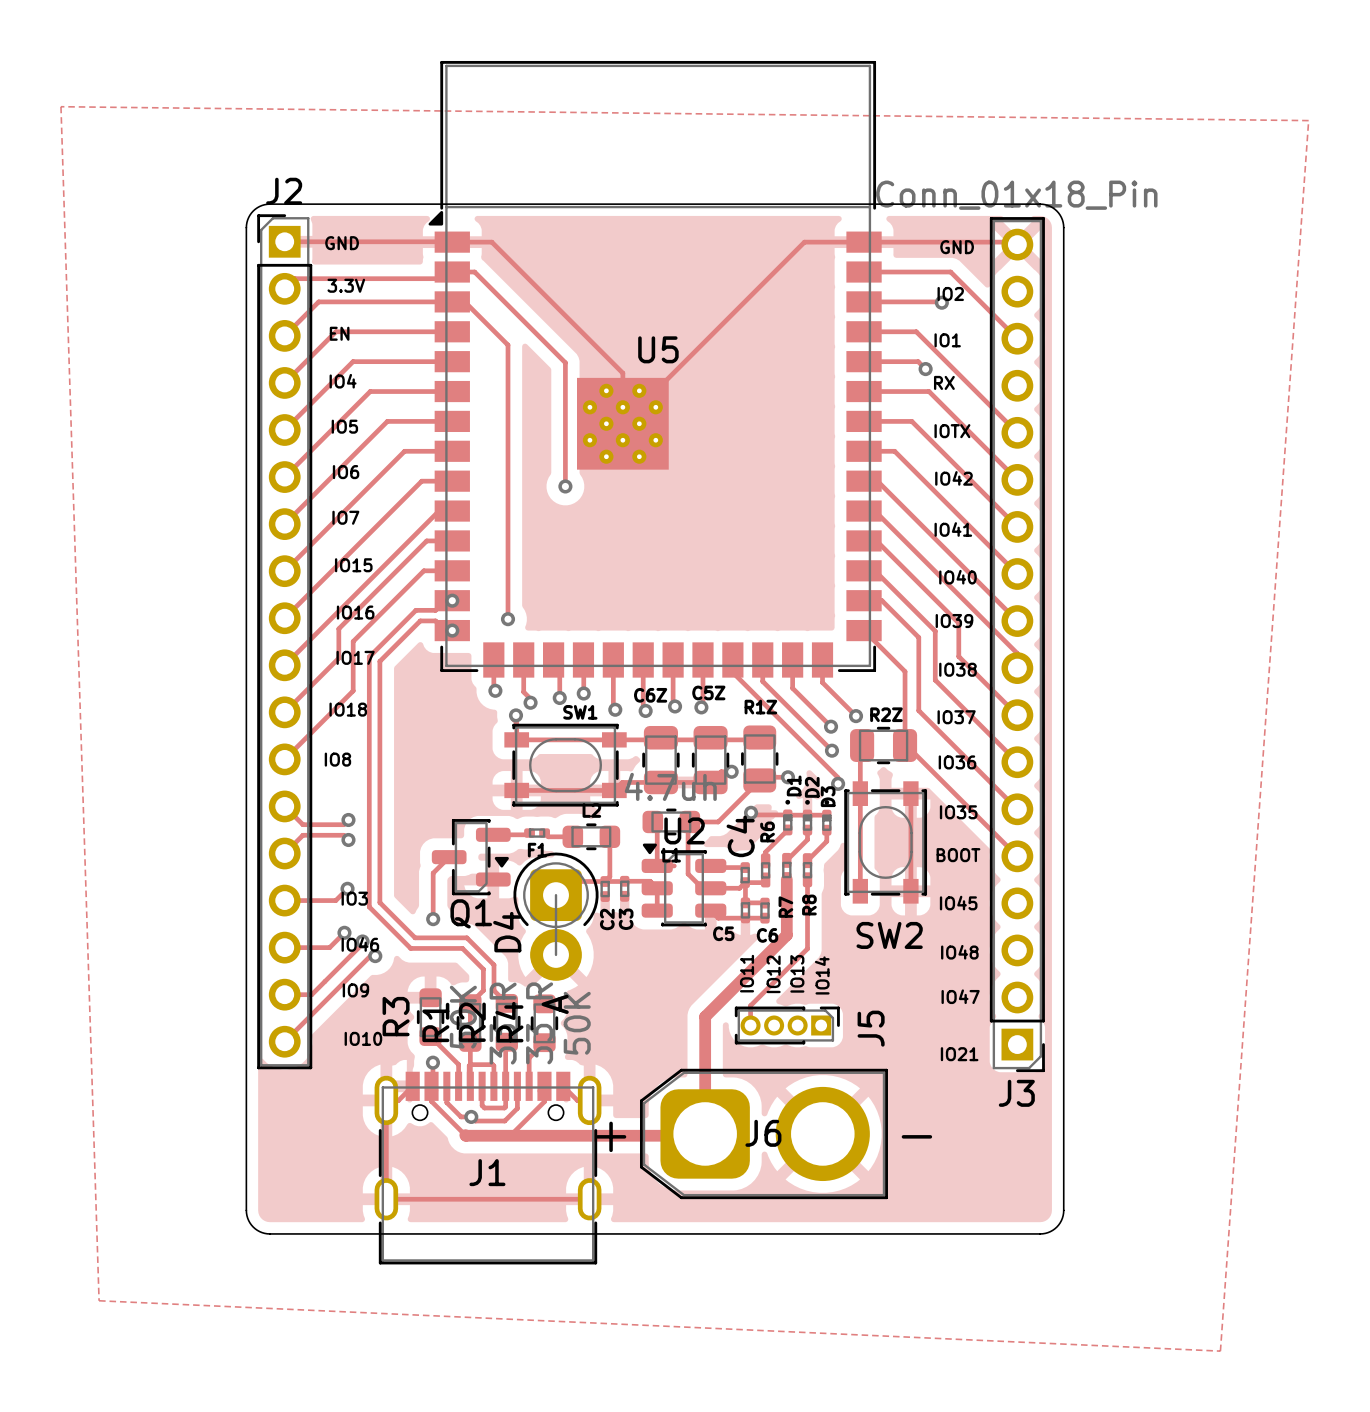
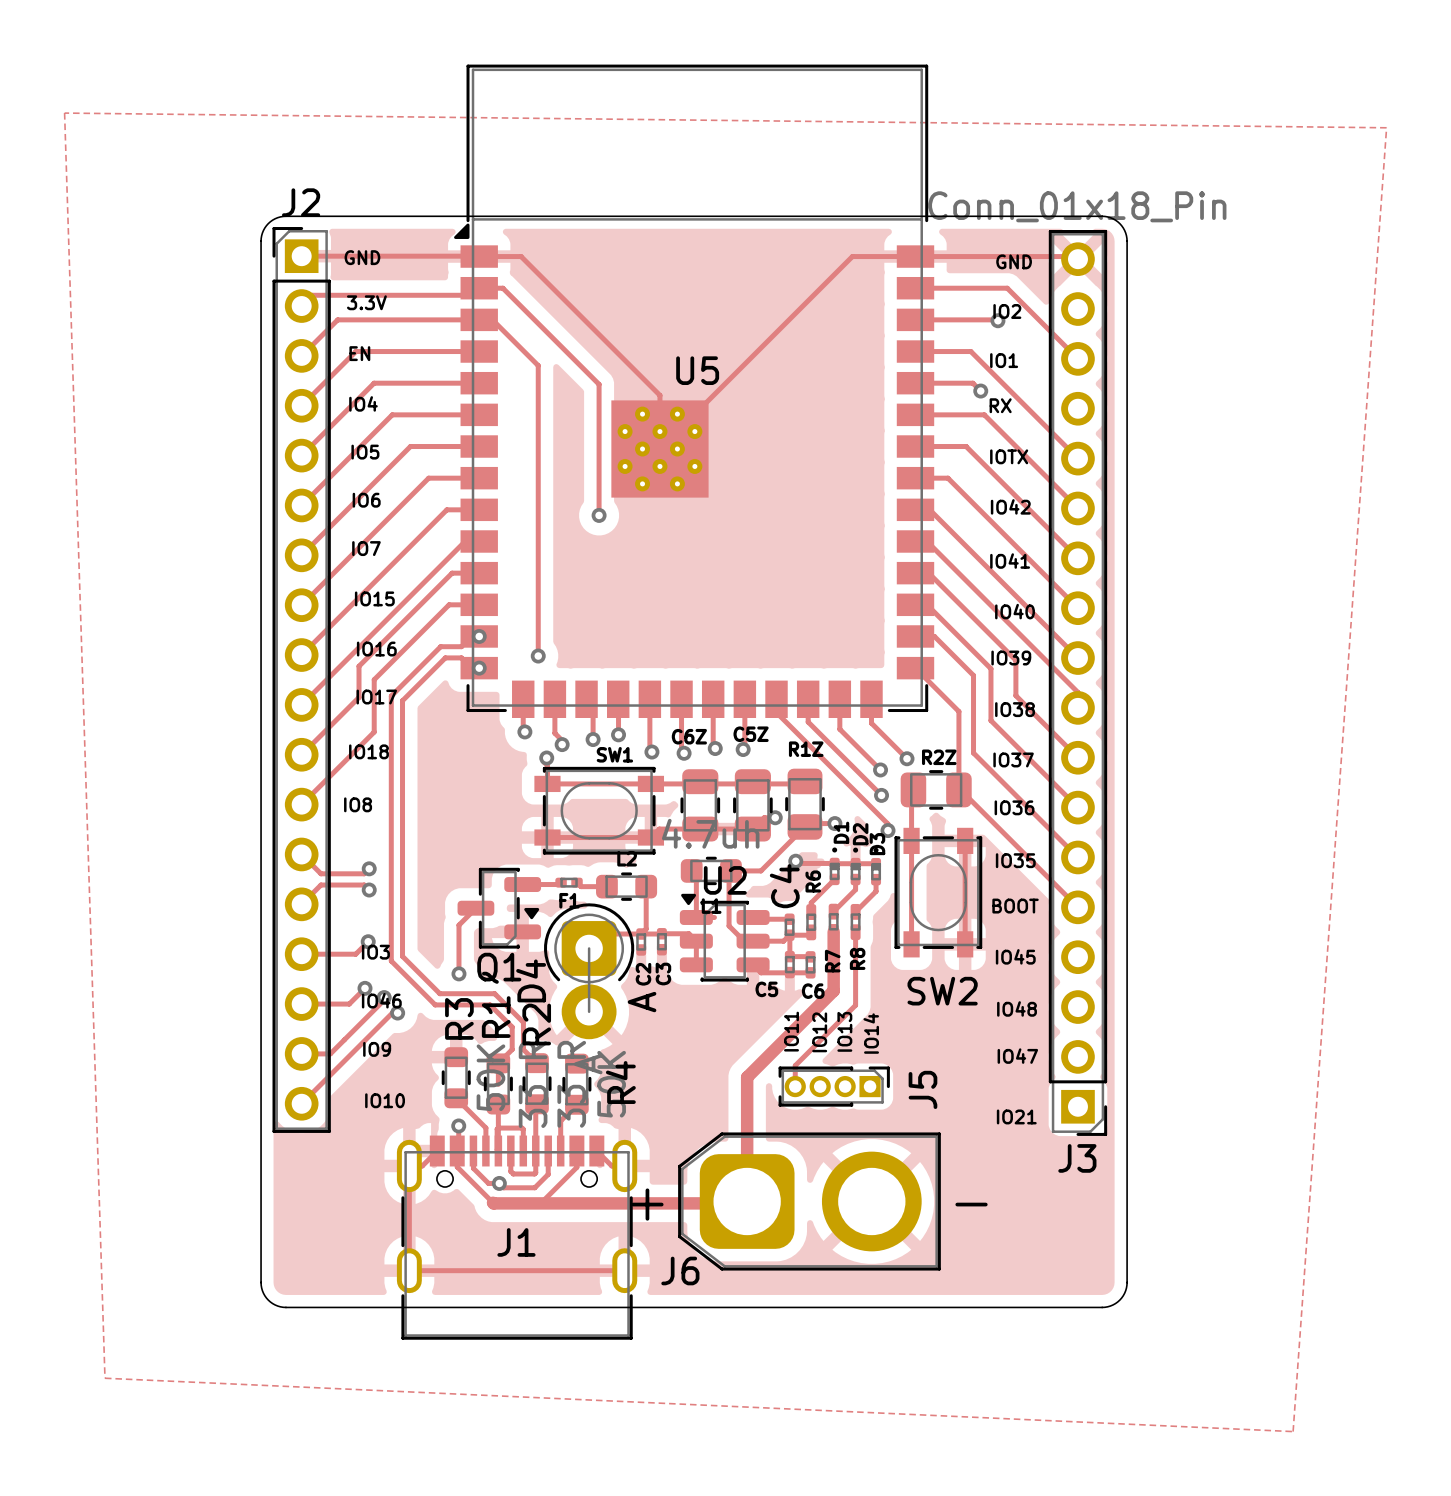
D4 footprint: [513, 852, 599, 981] -> [544, 903, 635, 1040]
R3 name position: R3 (396, 1016) -> R3 (459, 1018)
R1 name position: R1 (435, 1022) -> R1 (496, 1017)
R2 name position: R2 (472, 1022) -> R2 (536, 1024)
R4 name position: R4 (509, 1022) -> R4 (620, 1082)
J6 name position: J6 (763, 1133) -> J6 (680, 1270)

